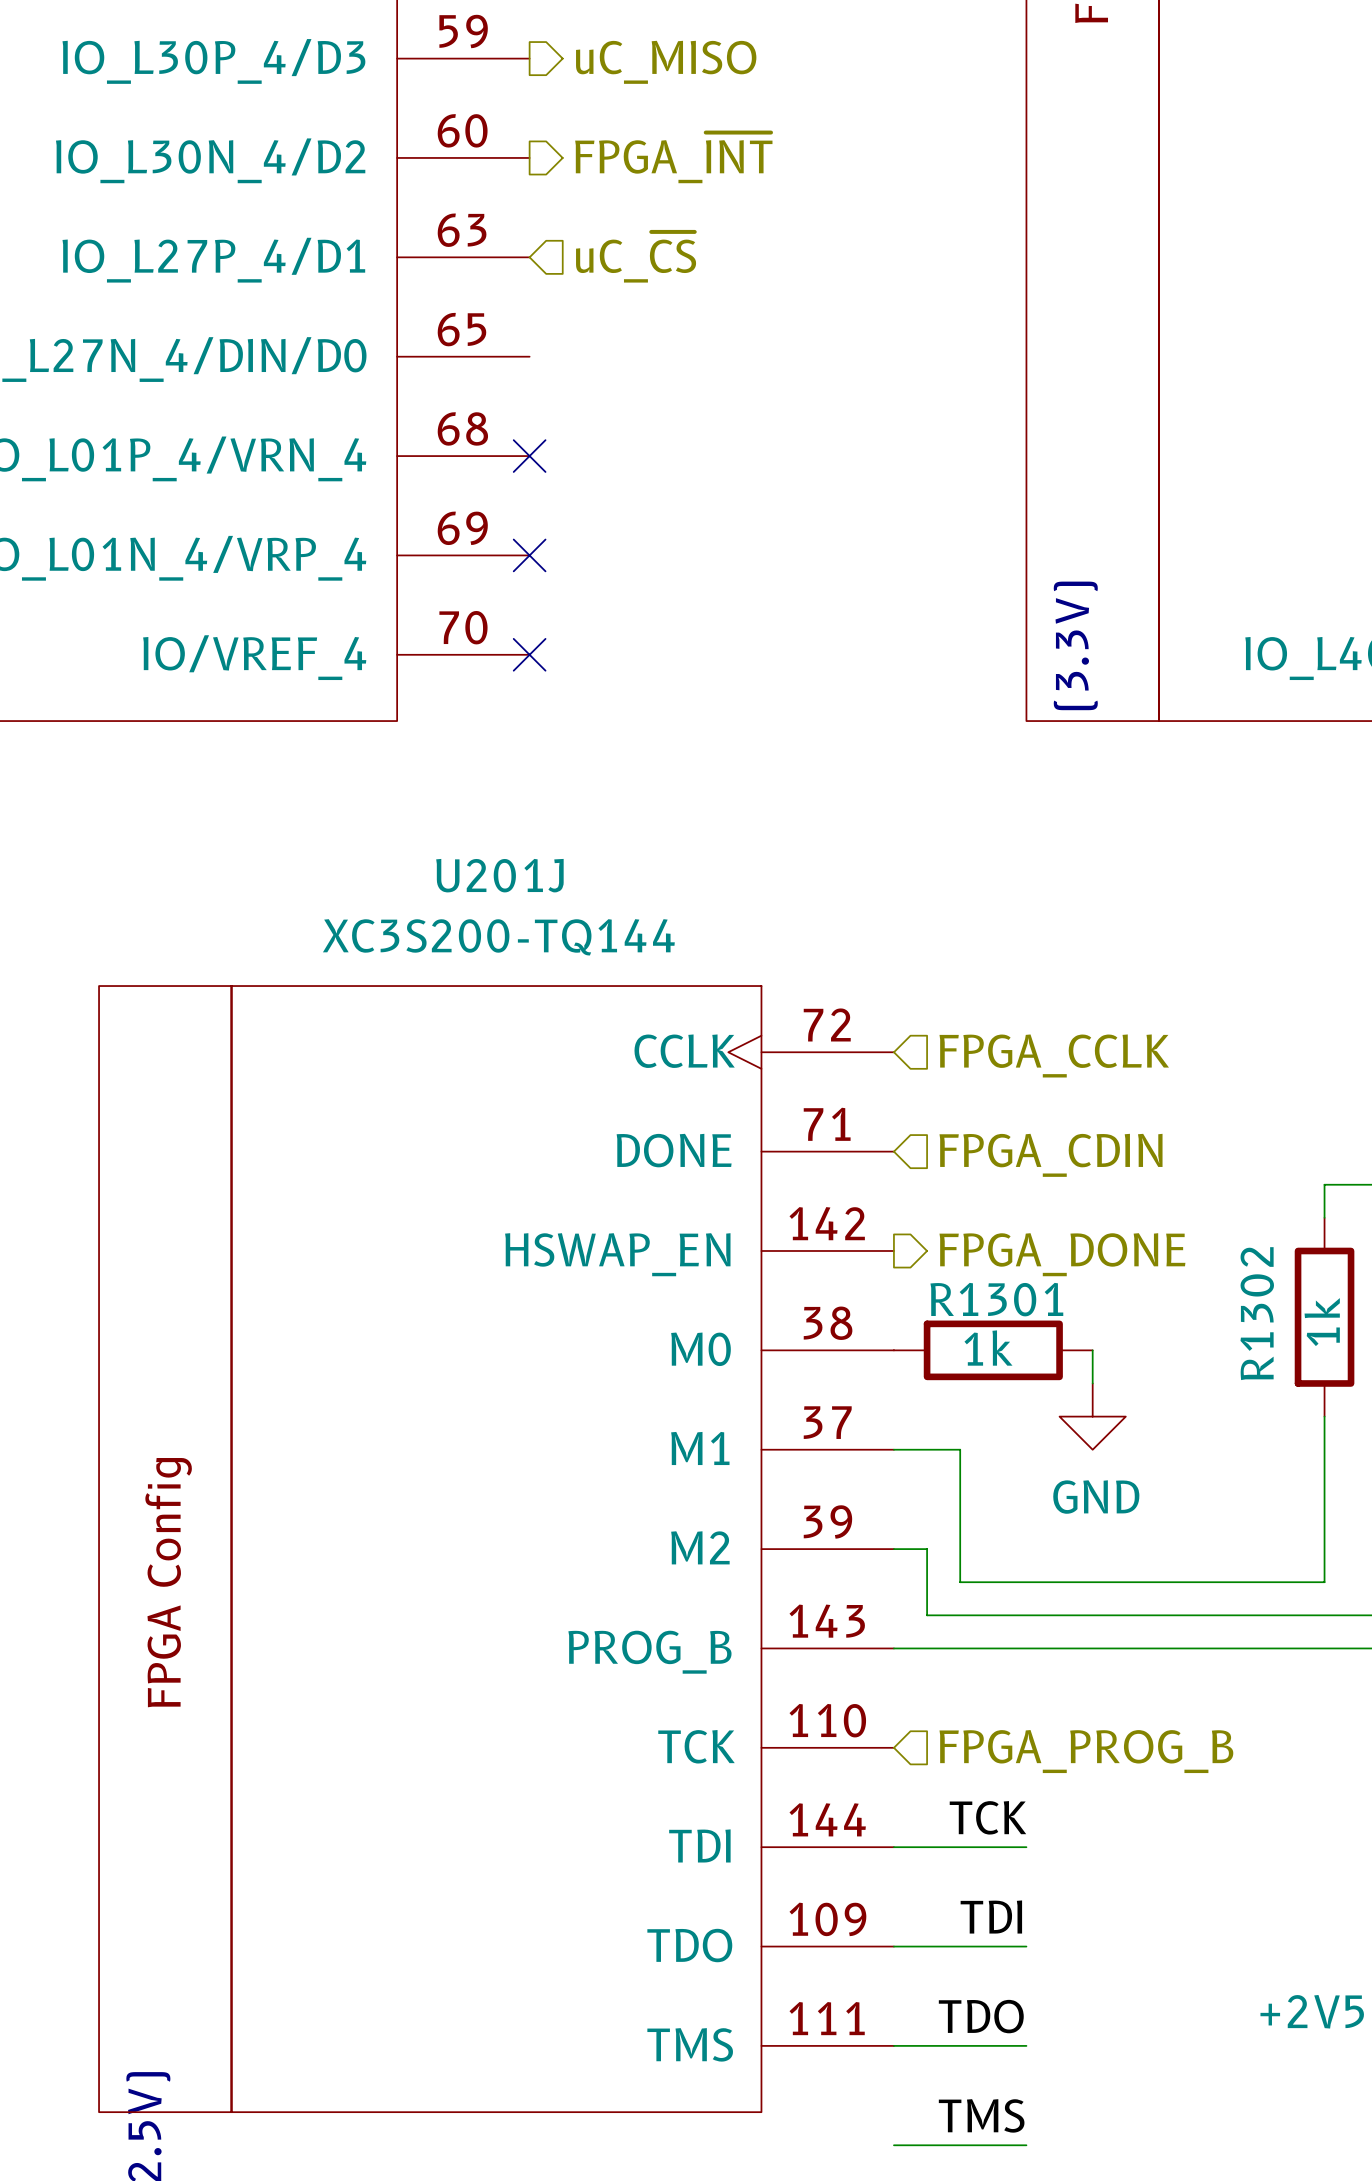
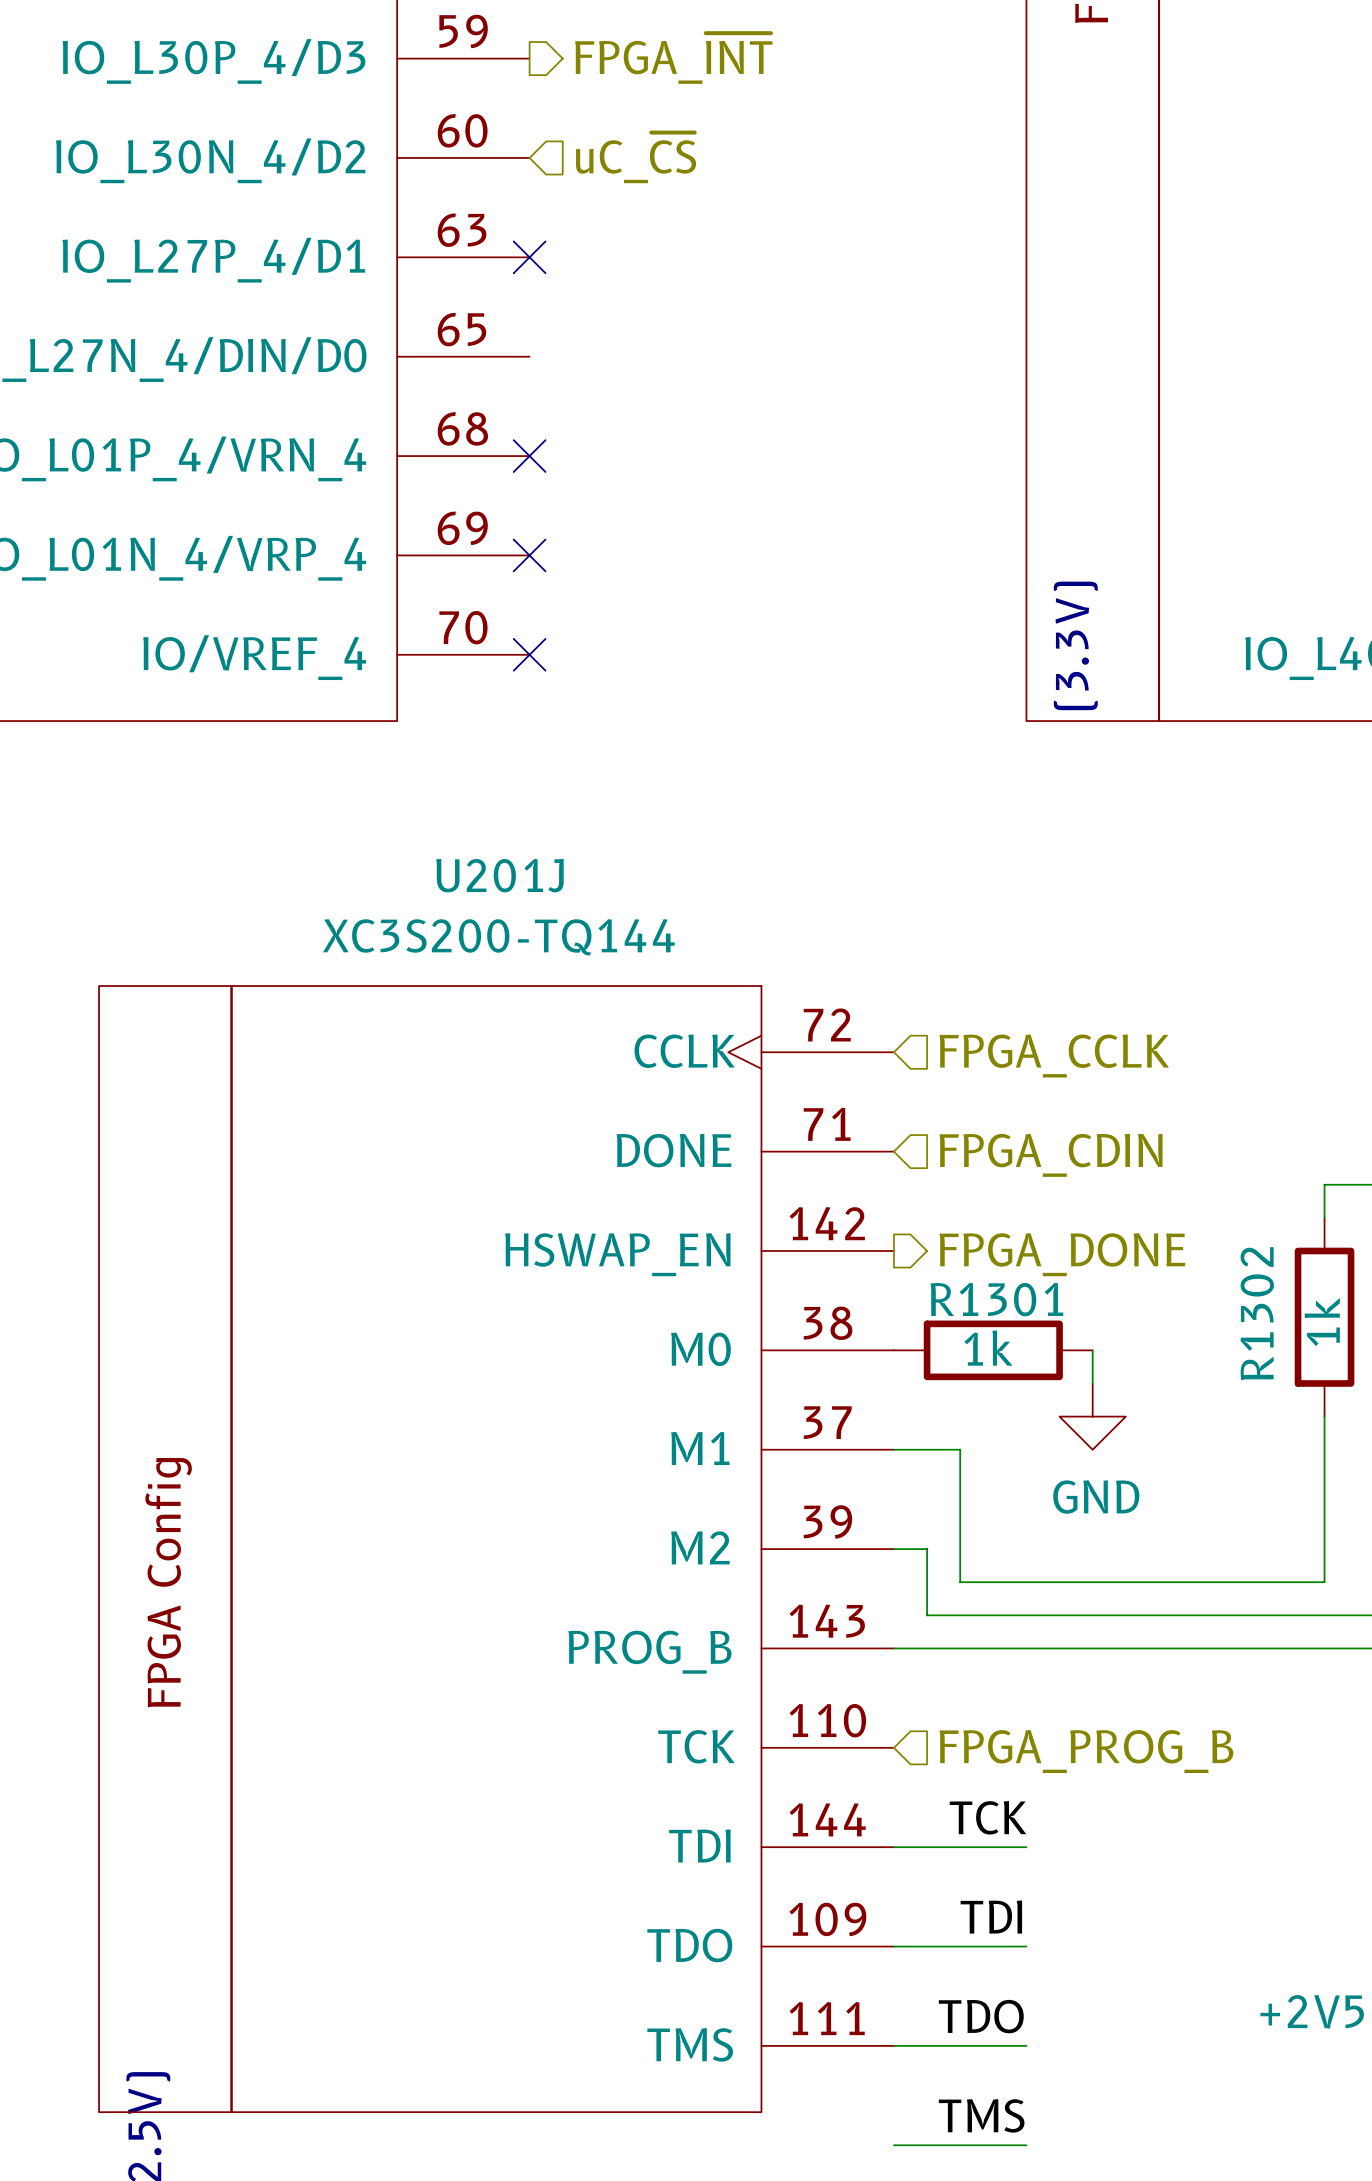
hierarchical label: uC_MISO (666, 62) -> FPGA_~{INT} (673, 58)
hierarchical label shape: output (673, 157) -> input (636, 157)
hierarchical label: FPGA_~{INT} (673, 157) -> uC_~{CS} (636, 157)
no-connect mark: none -> (529, 257)
hierarchical label: uC_~{CS} (636, 257) -> none

